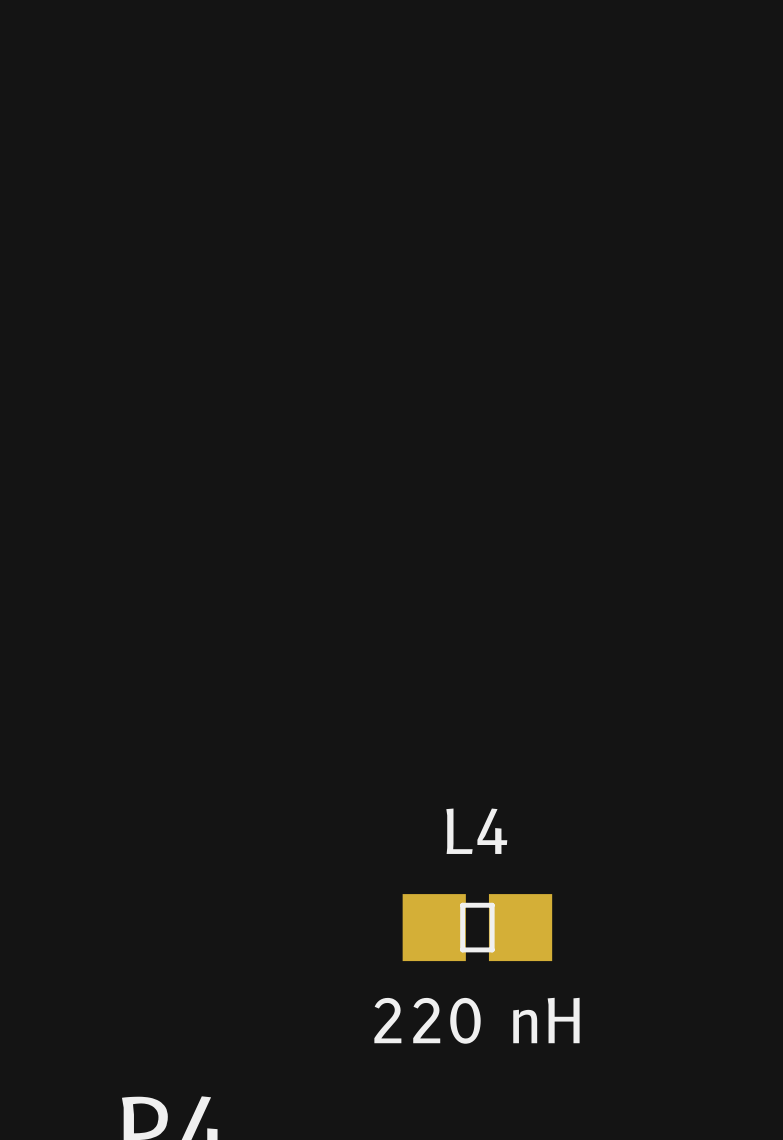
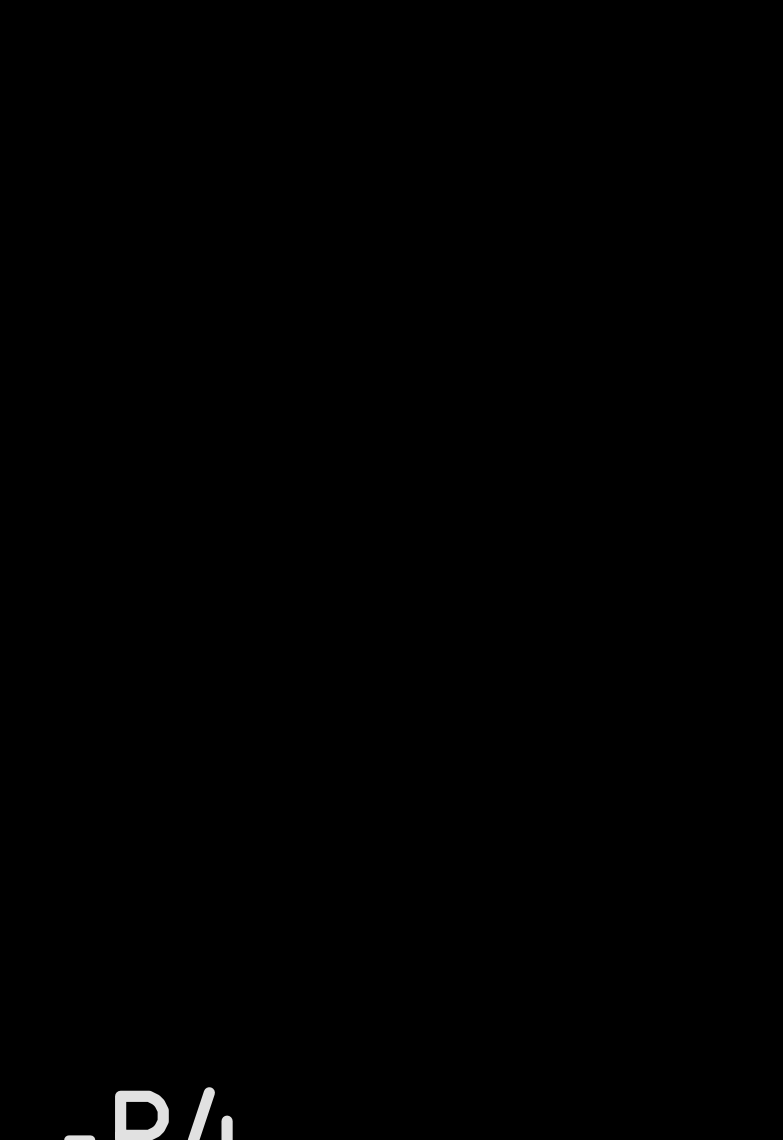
L4: 220 nH (477, 927) -> none

